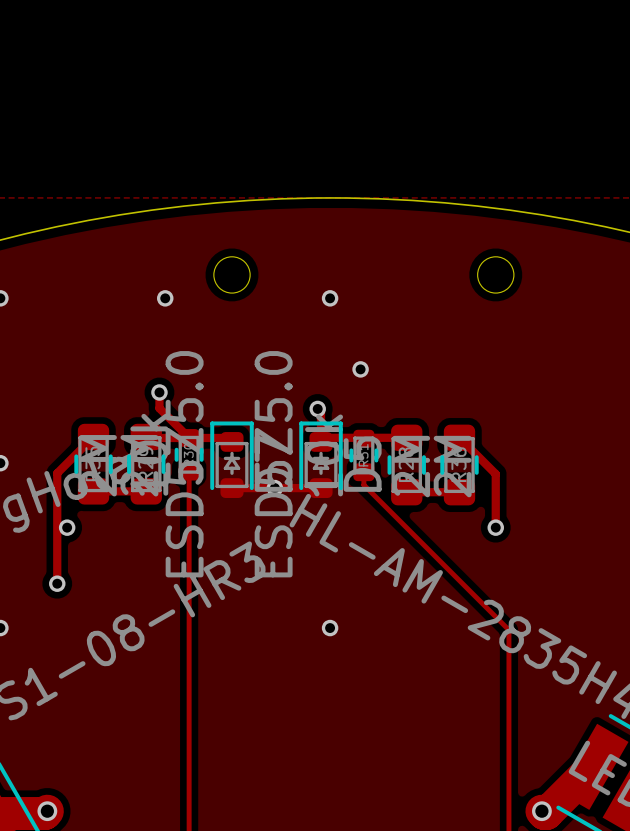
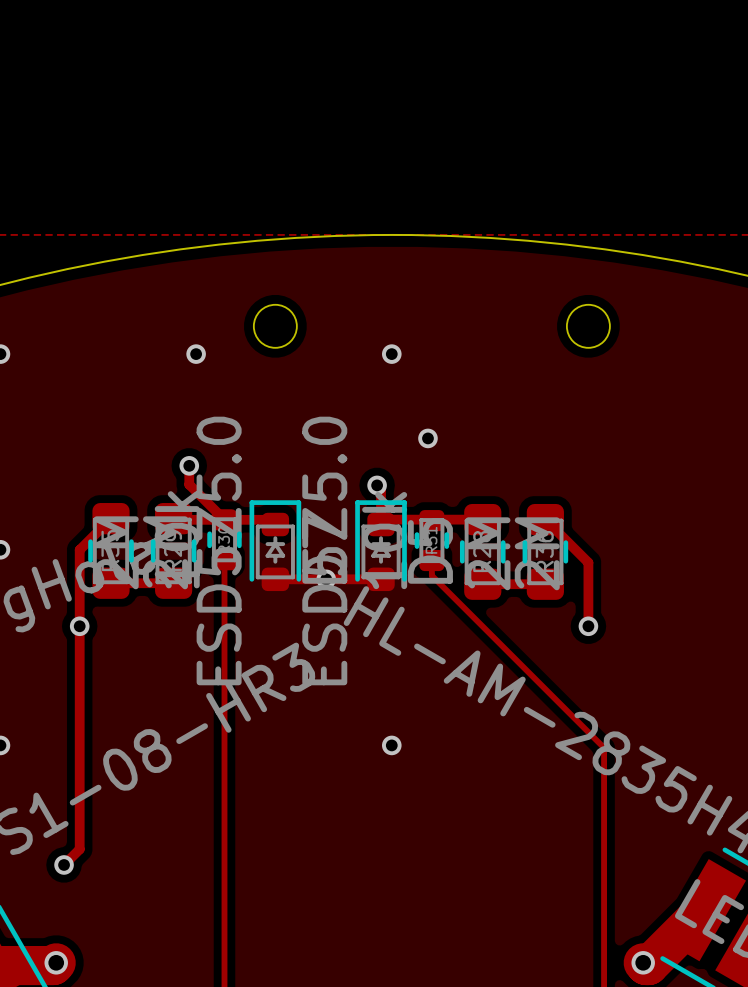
track: (67, 463) (57, 473) (57, 583) -> (79, 549) (79, 849) (64, 864)
via position: (57, 583) -> (64, 864)

